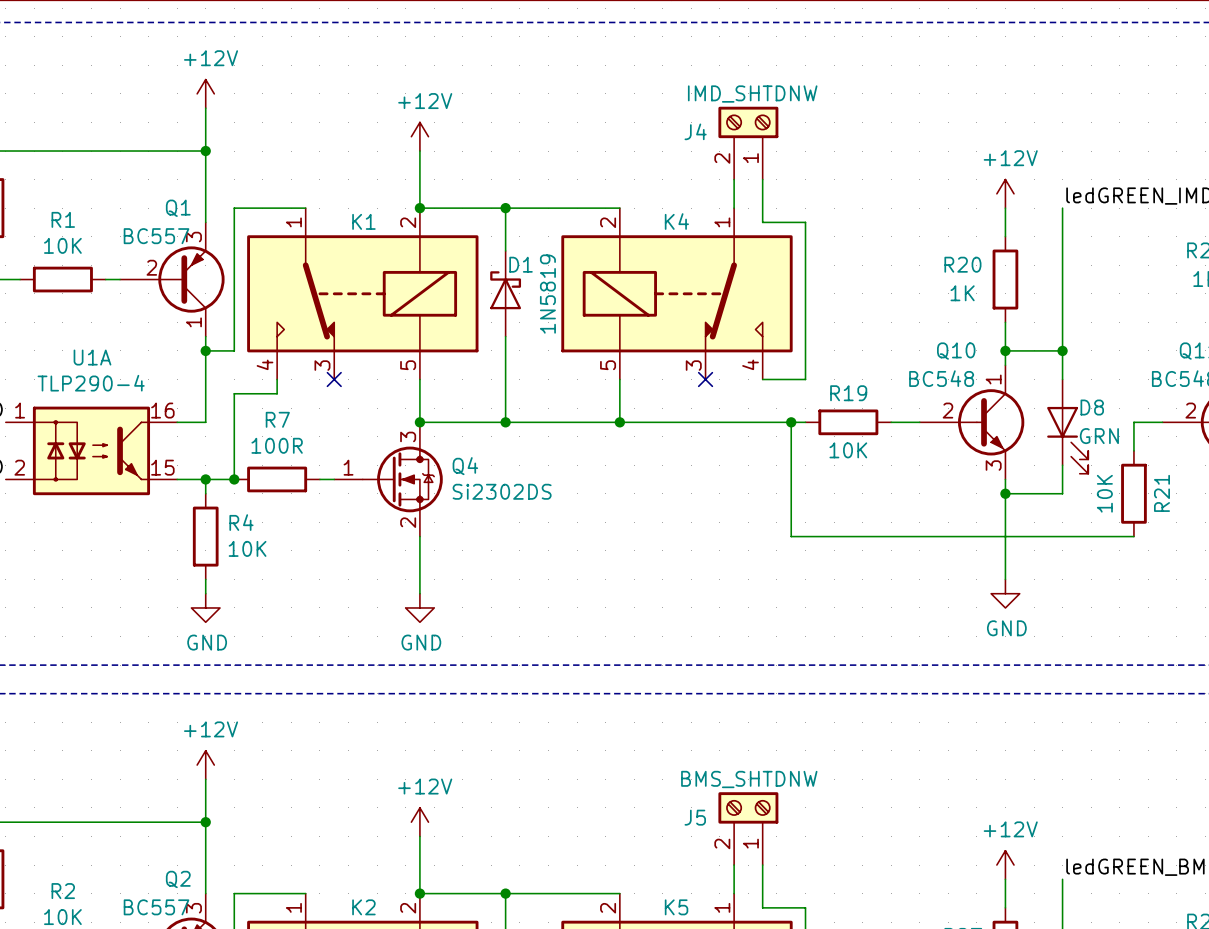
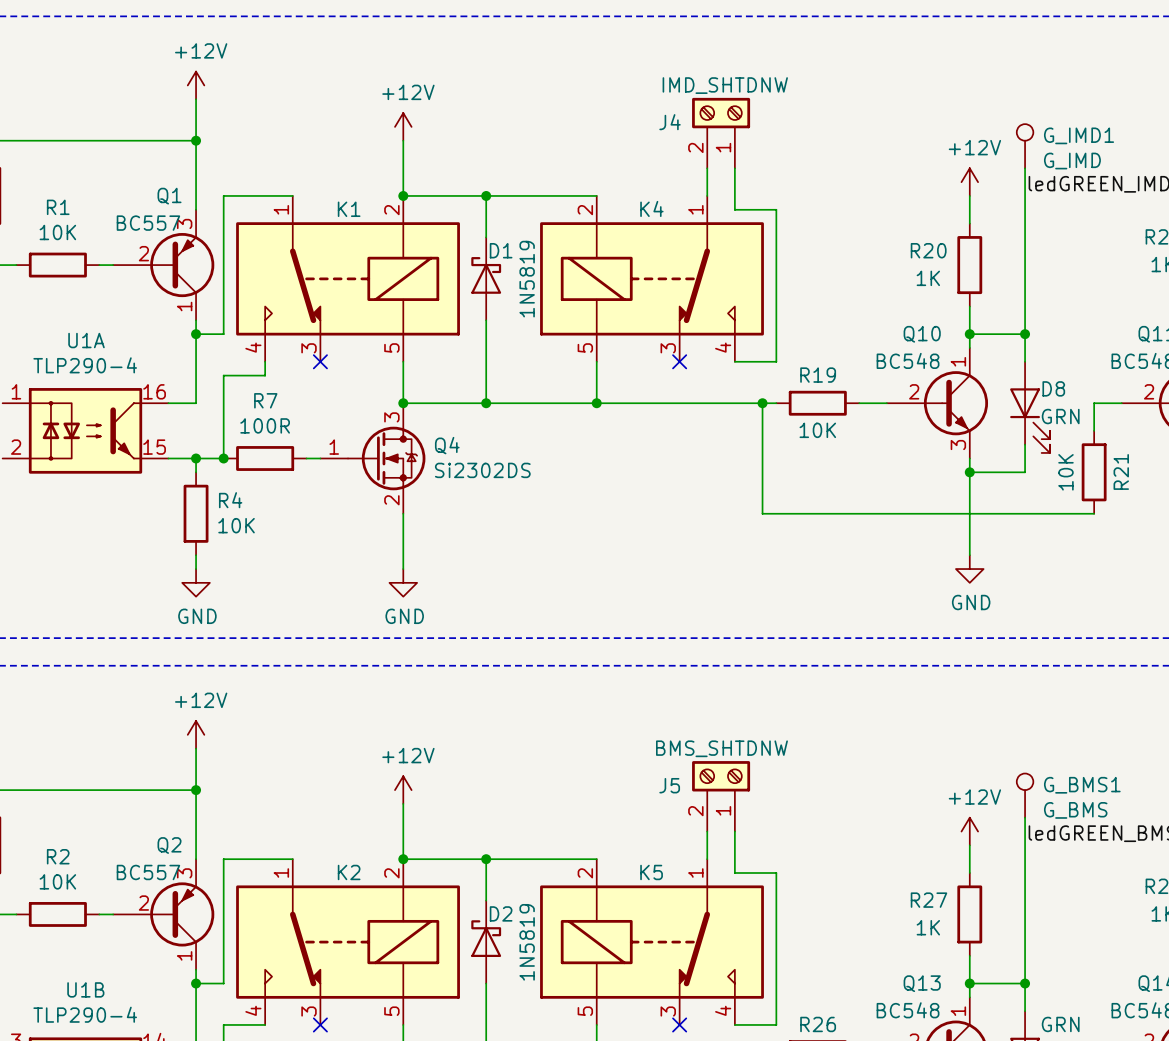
G_IMD1: none -> G_IMD (1025, 146)
wire: none -> (1025, 168) (1025, 195)
G_BMS1: none -> G_BMS (1025, 795)
wire: none -> (1025, 817) (1025, 845)

